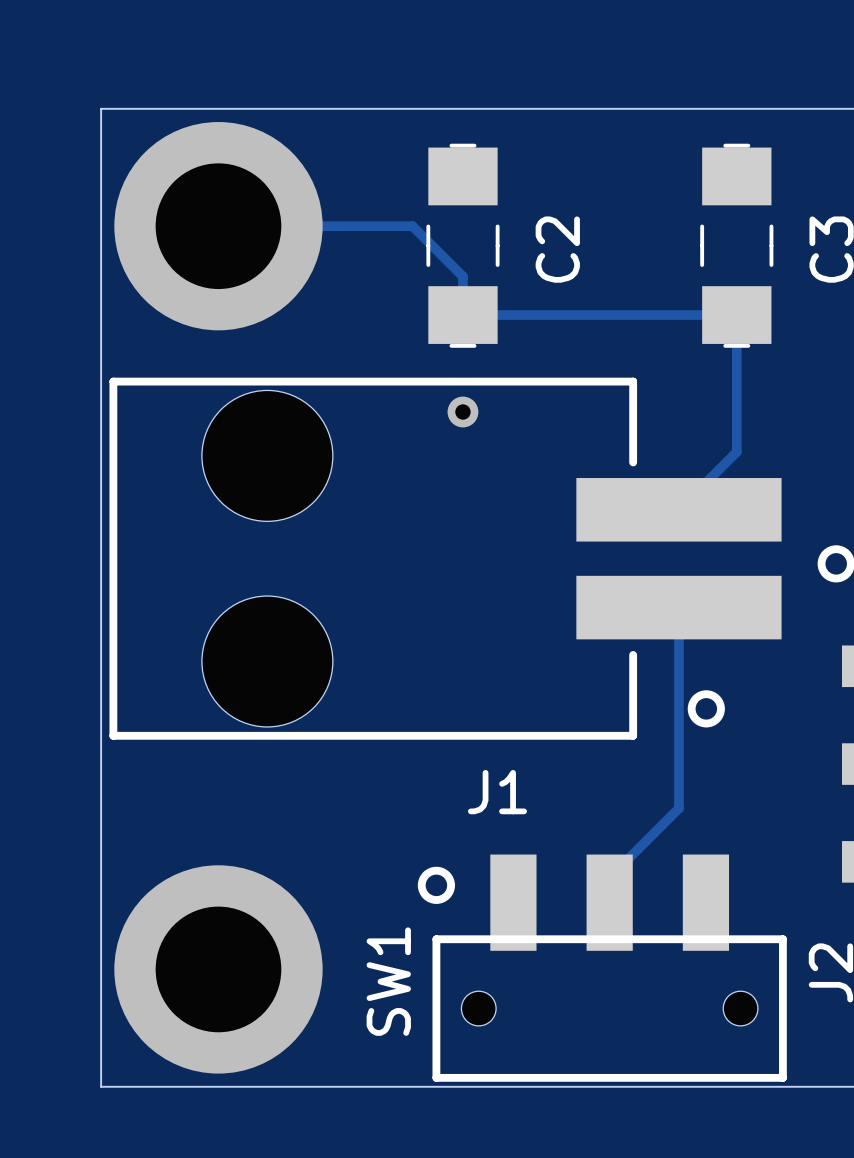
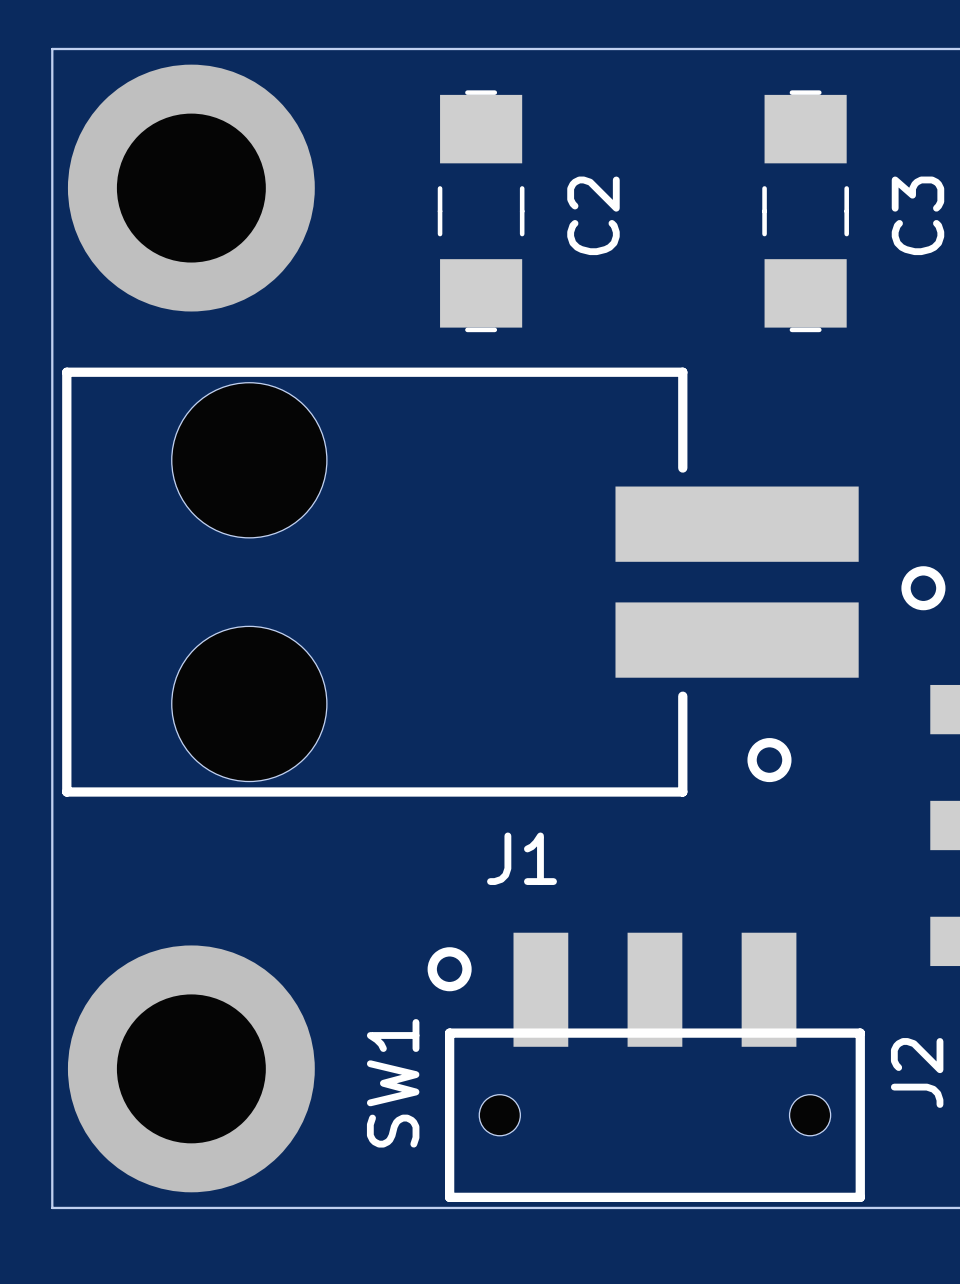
track: (218, 226) (412, 226) (462, 276) (462, 315) (736, 315) (736, 451) (678, 509) -> none
via: (462, 412) -> none
track: (678, 607) (678, 808) (609, 877) (609, 902) -> none

